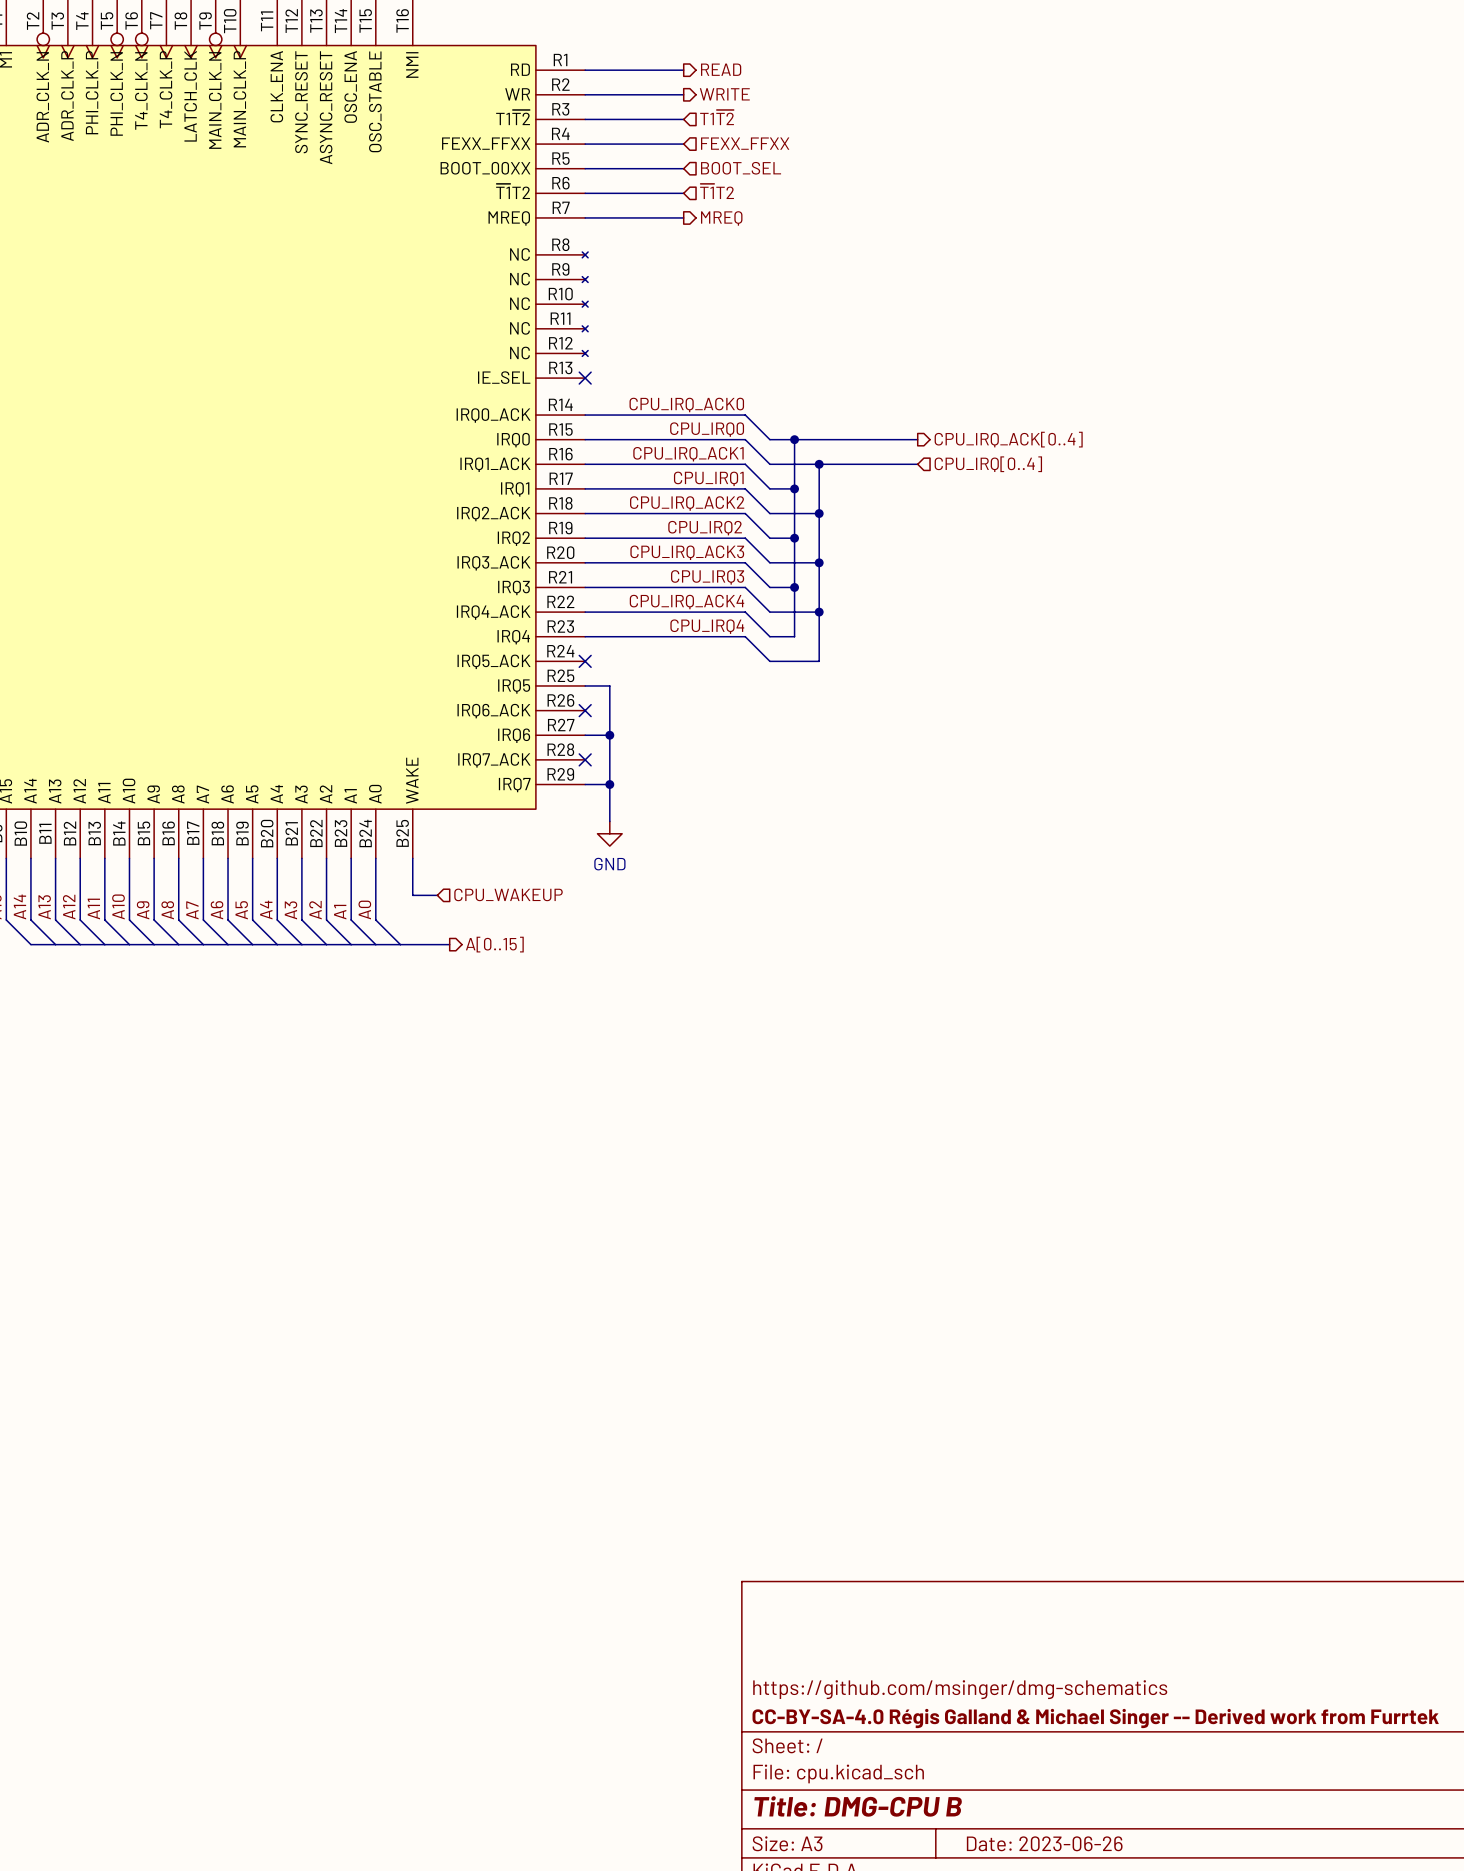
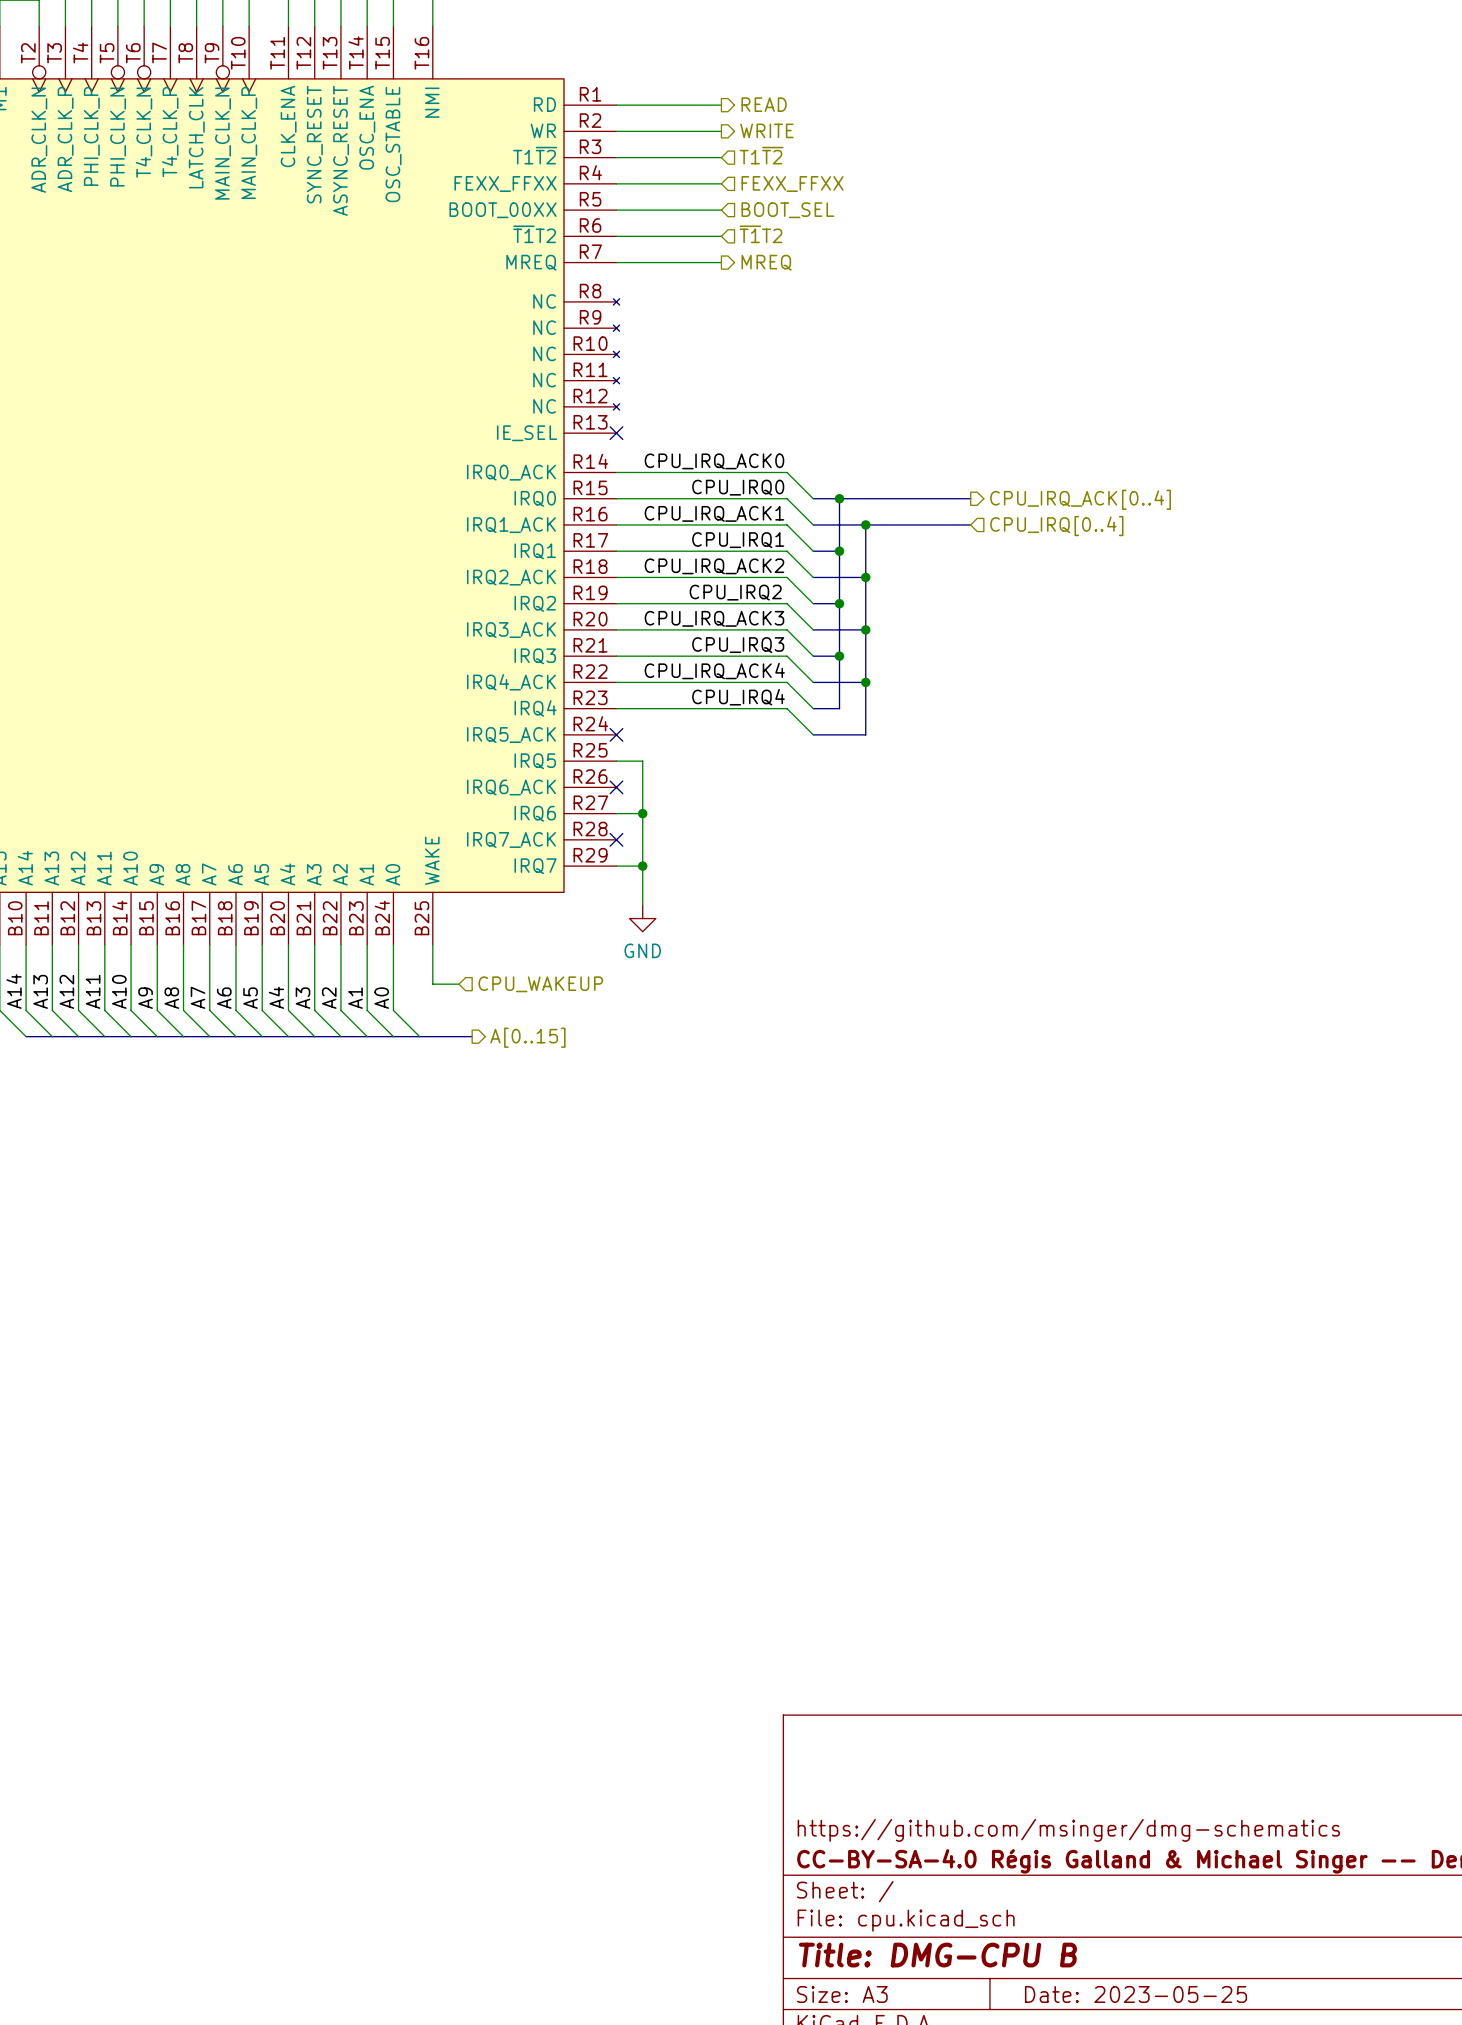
title block: Date: 2023-06-26 (1044, 1843) -> Date: 2023-05-25 (1136, 1994)

